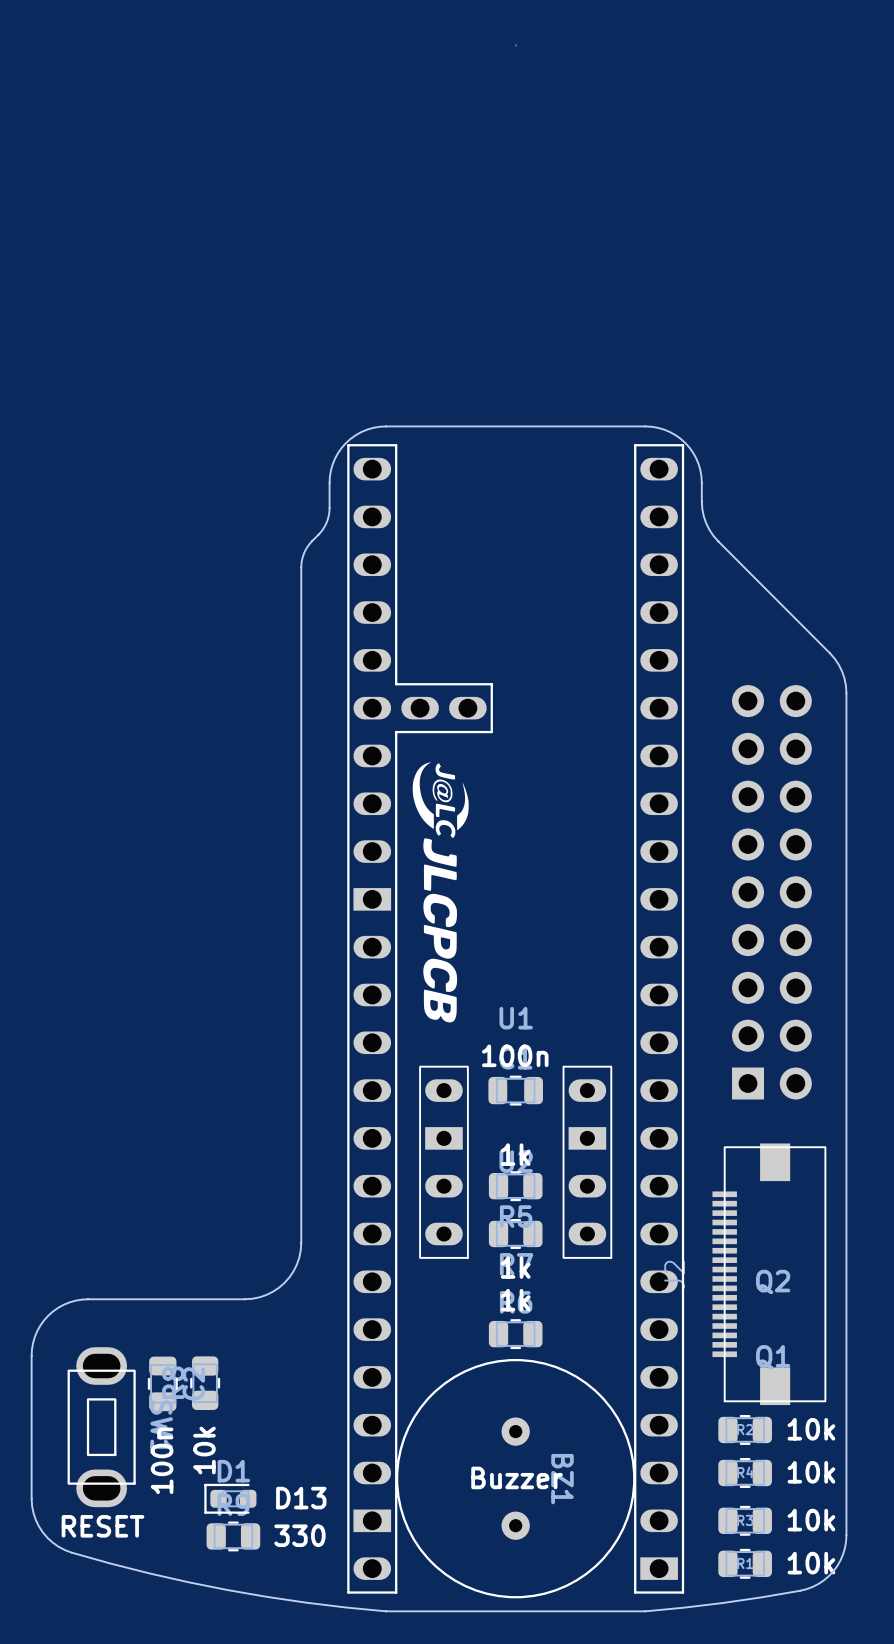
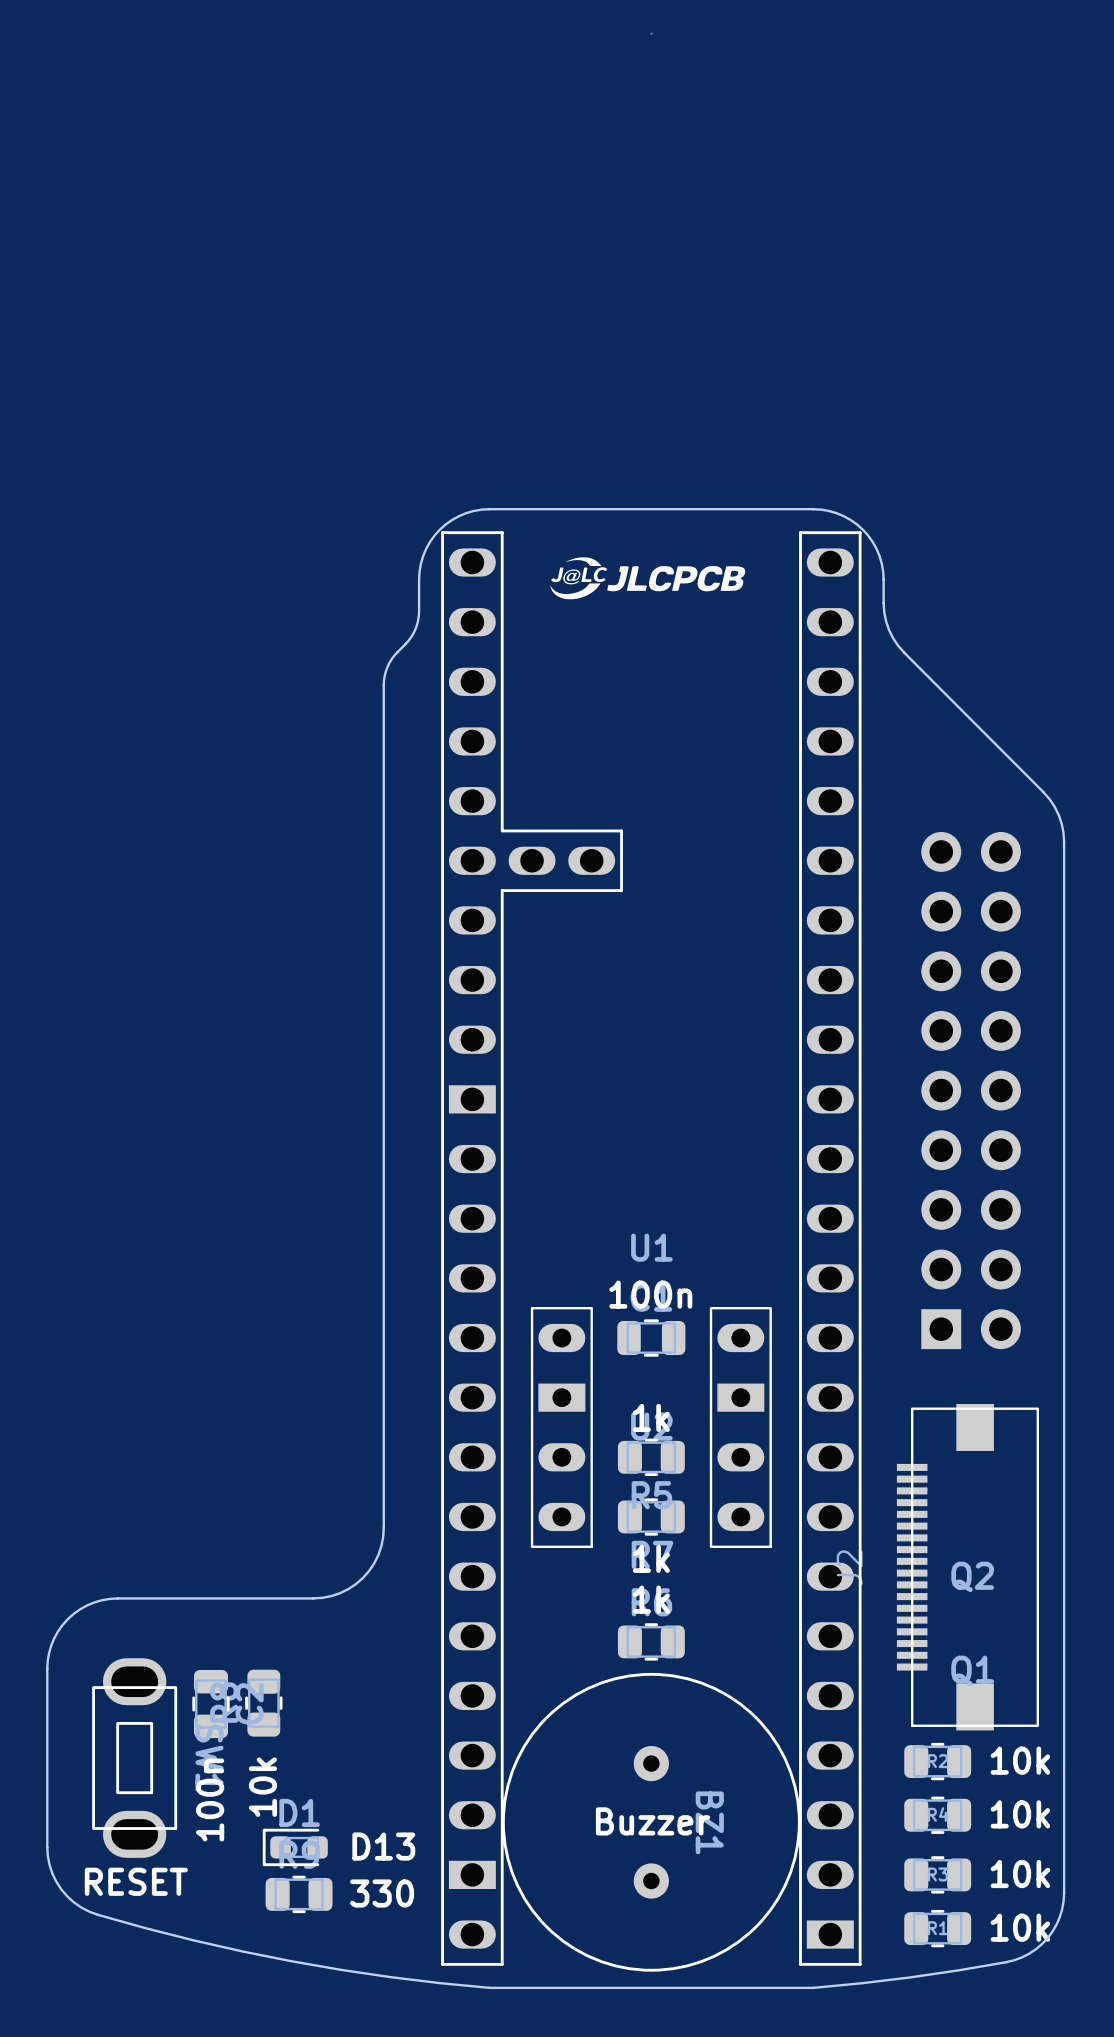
drawing: none -> [550, 557, 746, 600]
drawing: [412, 762, 469, 1023] -> none

